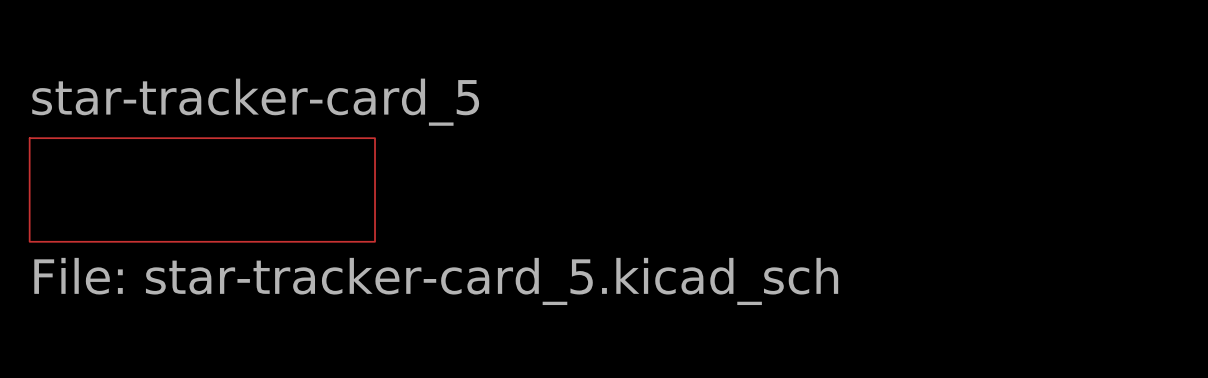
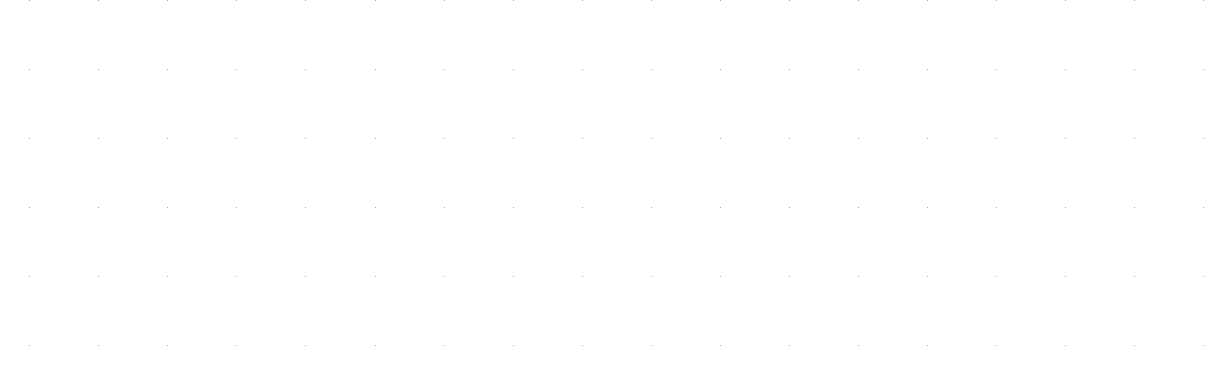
sheet star-tracker-card_5: File: star-tracker-card_5.kicad_sch (202, 189) -> none

